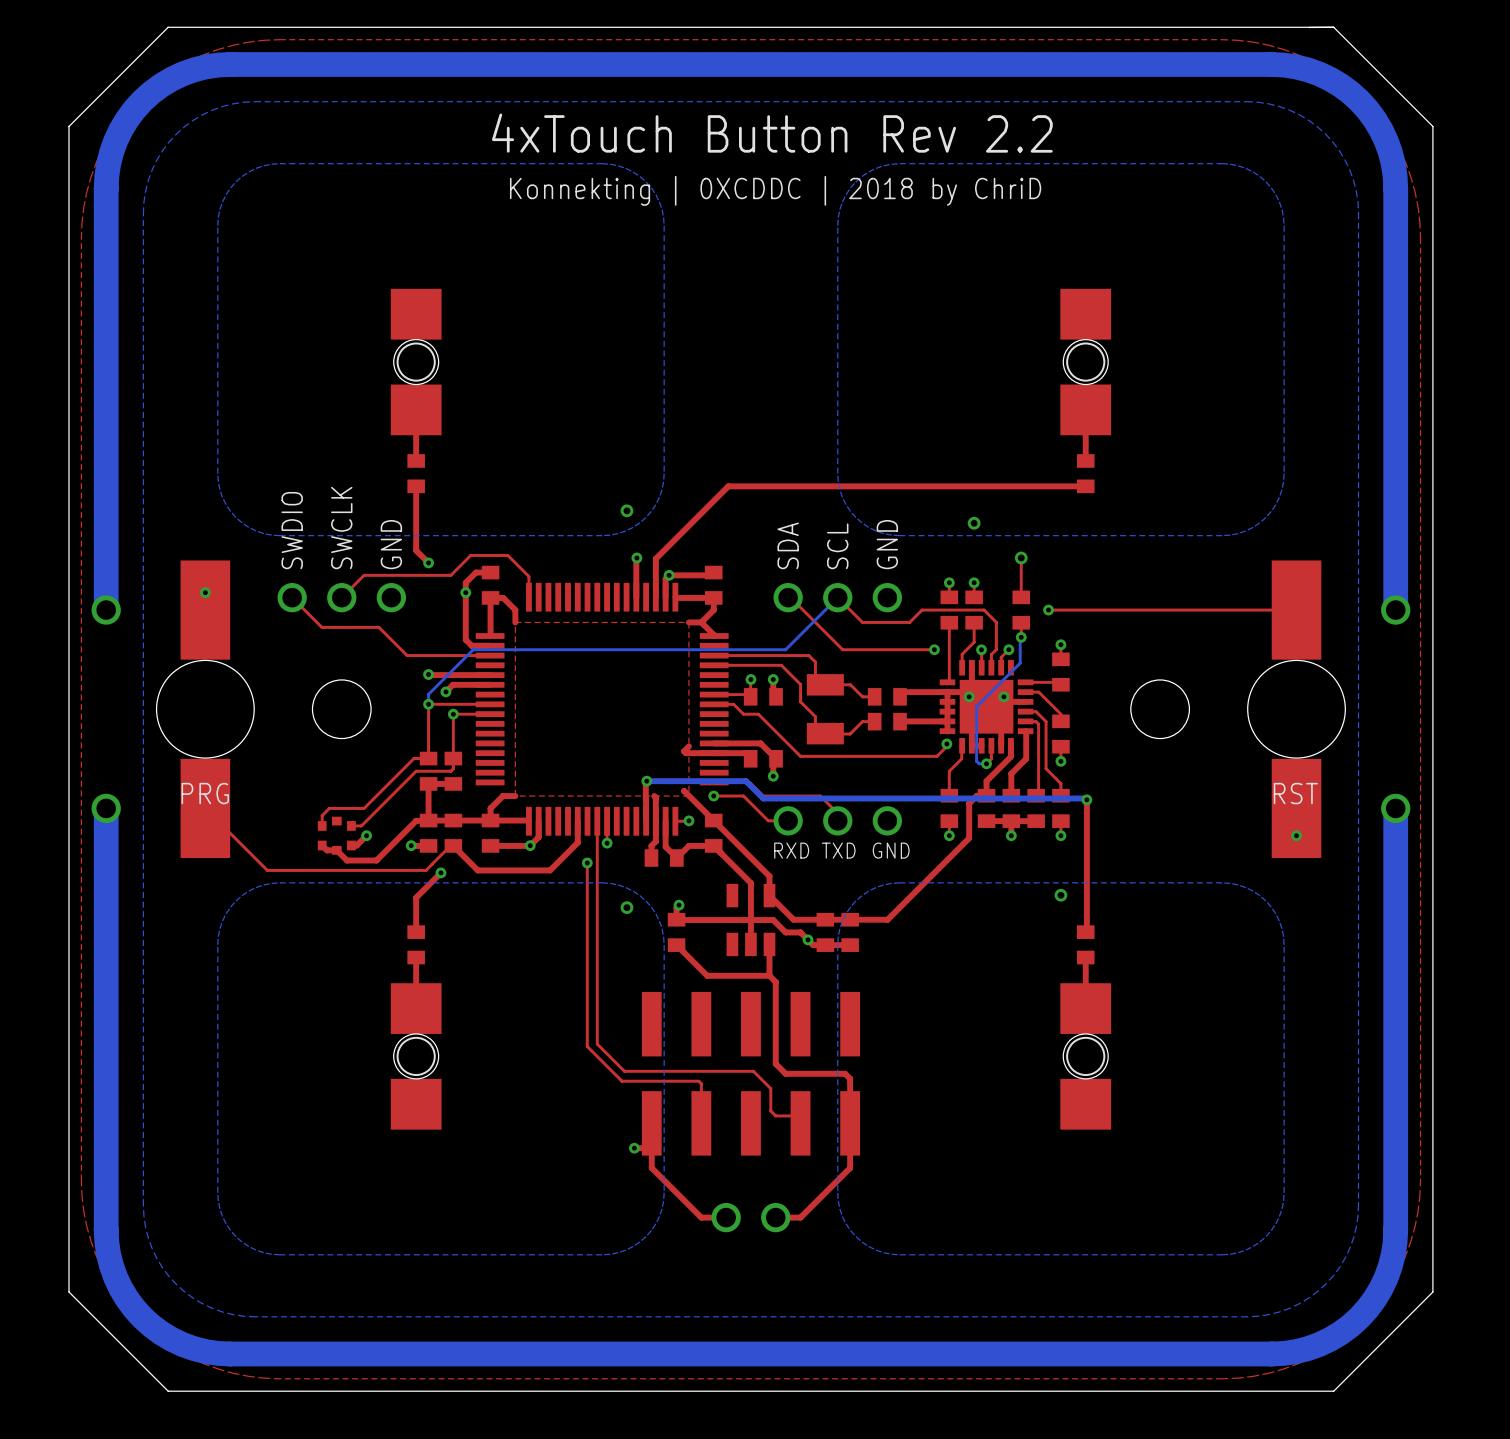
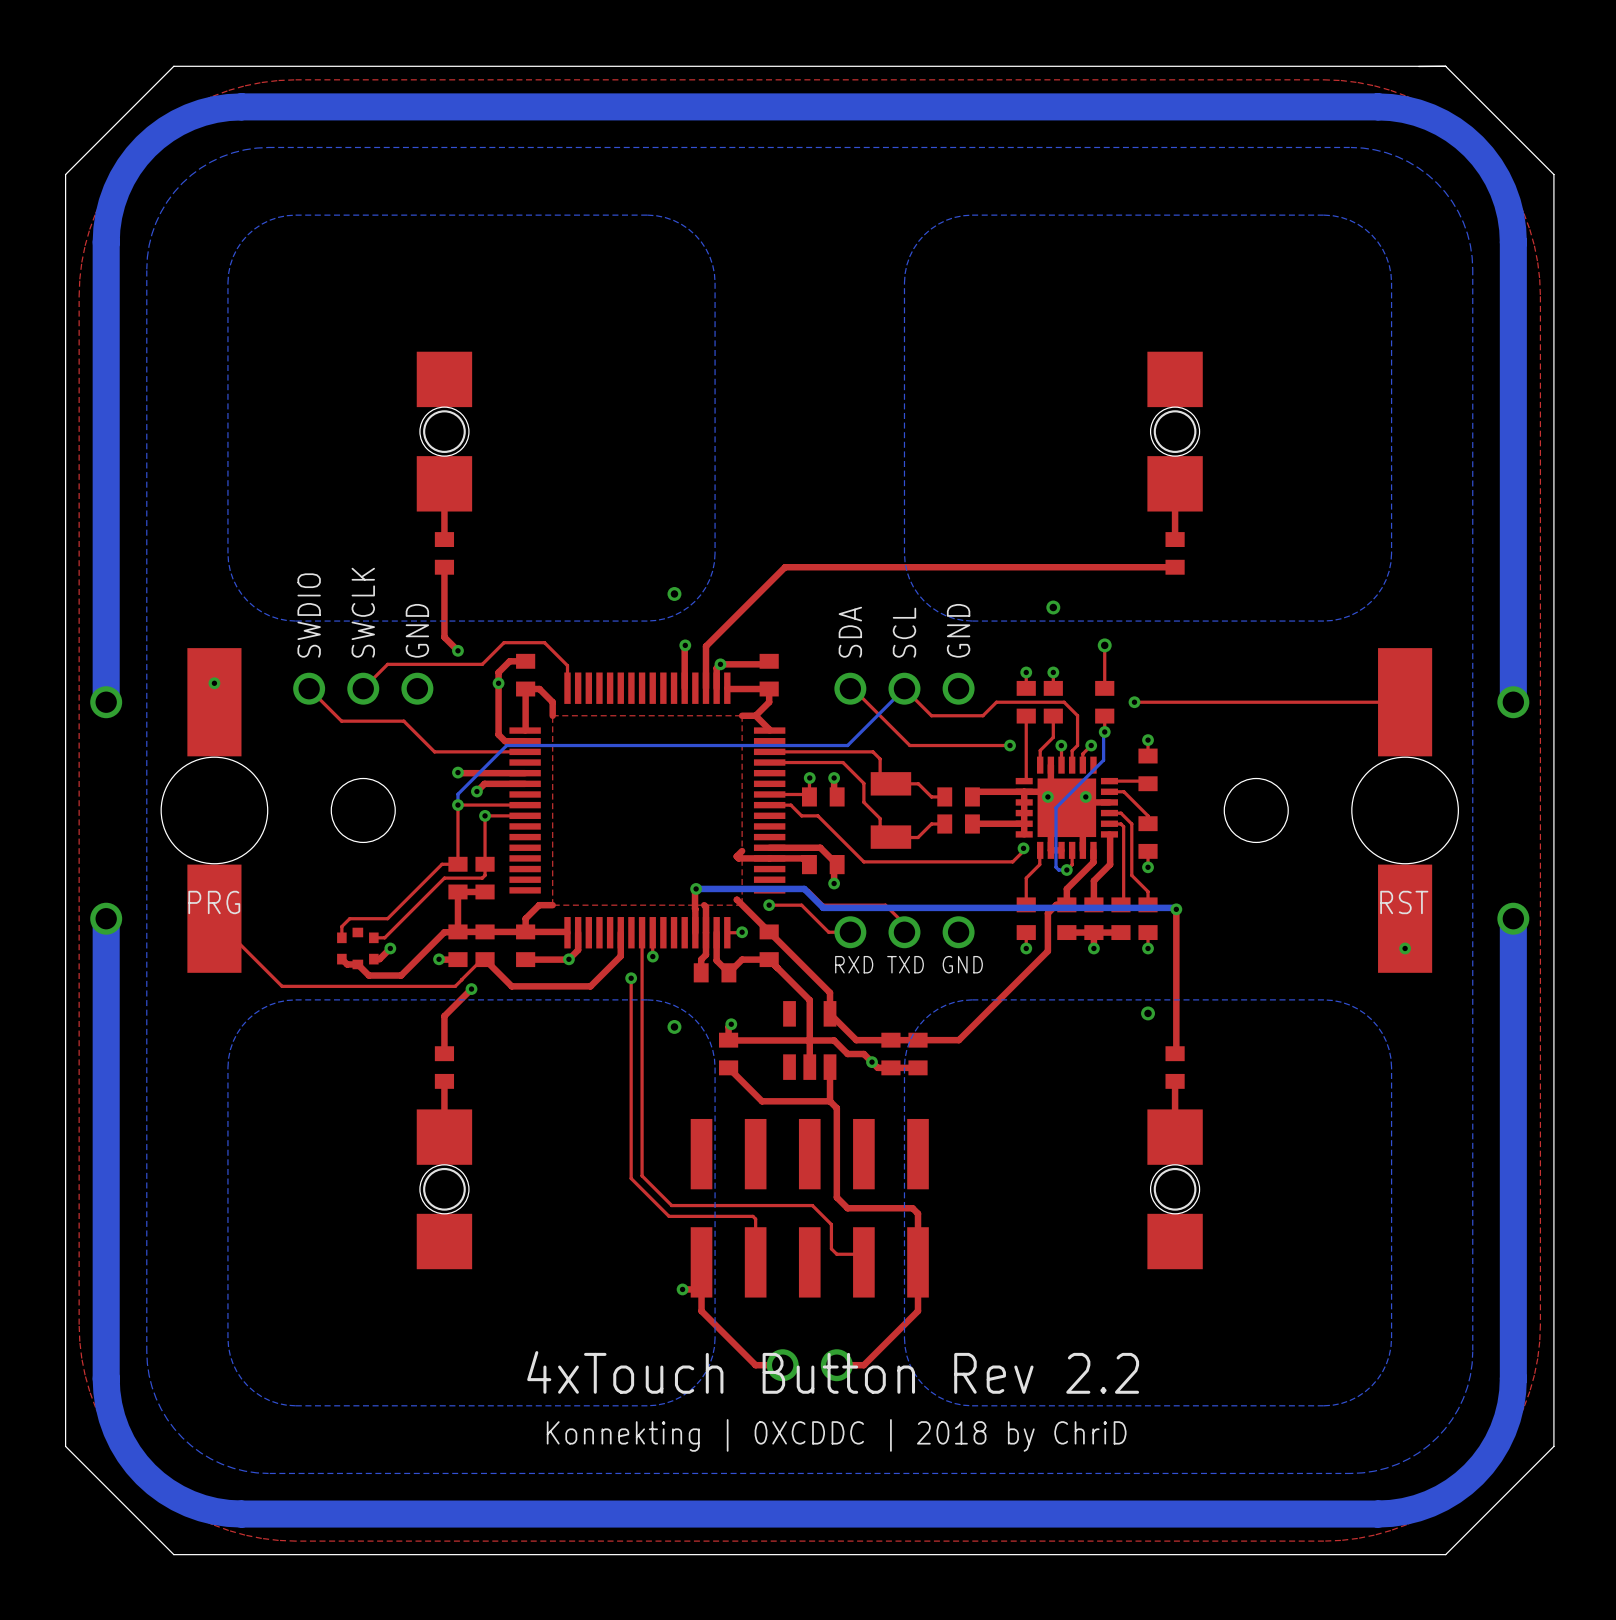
text: 4xTouch Button Rev 2.2 (772, 133) -> none
text: Konnekting | 0XCDDC | 2018 by ChriD (775, 190) -> none
text: none -> 4xTouch Button Rev 2.2 (833, 1372)
text: none -> Konnekting | 0XCDDC | 2018 by ChriD (836, 1435)

